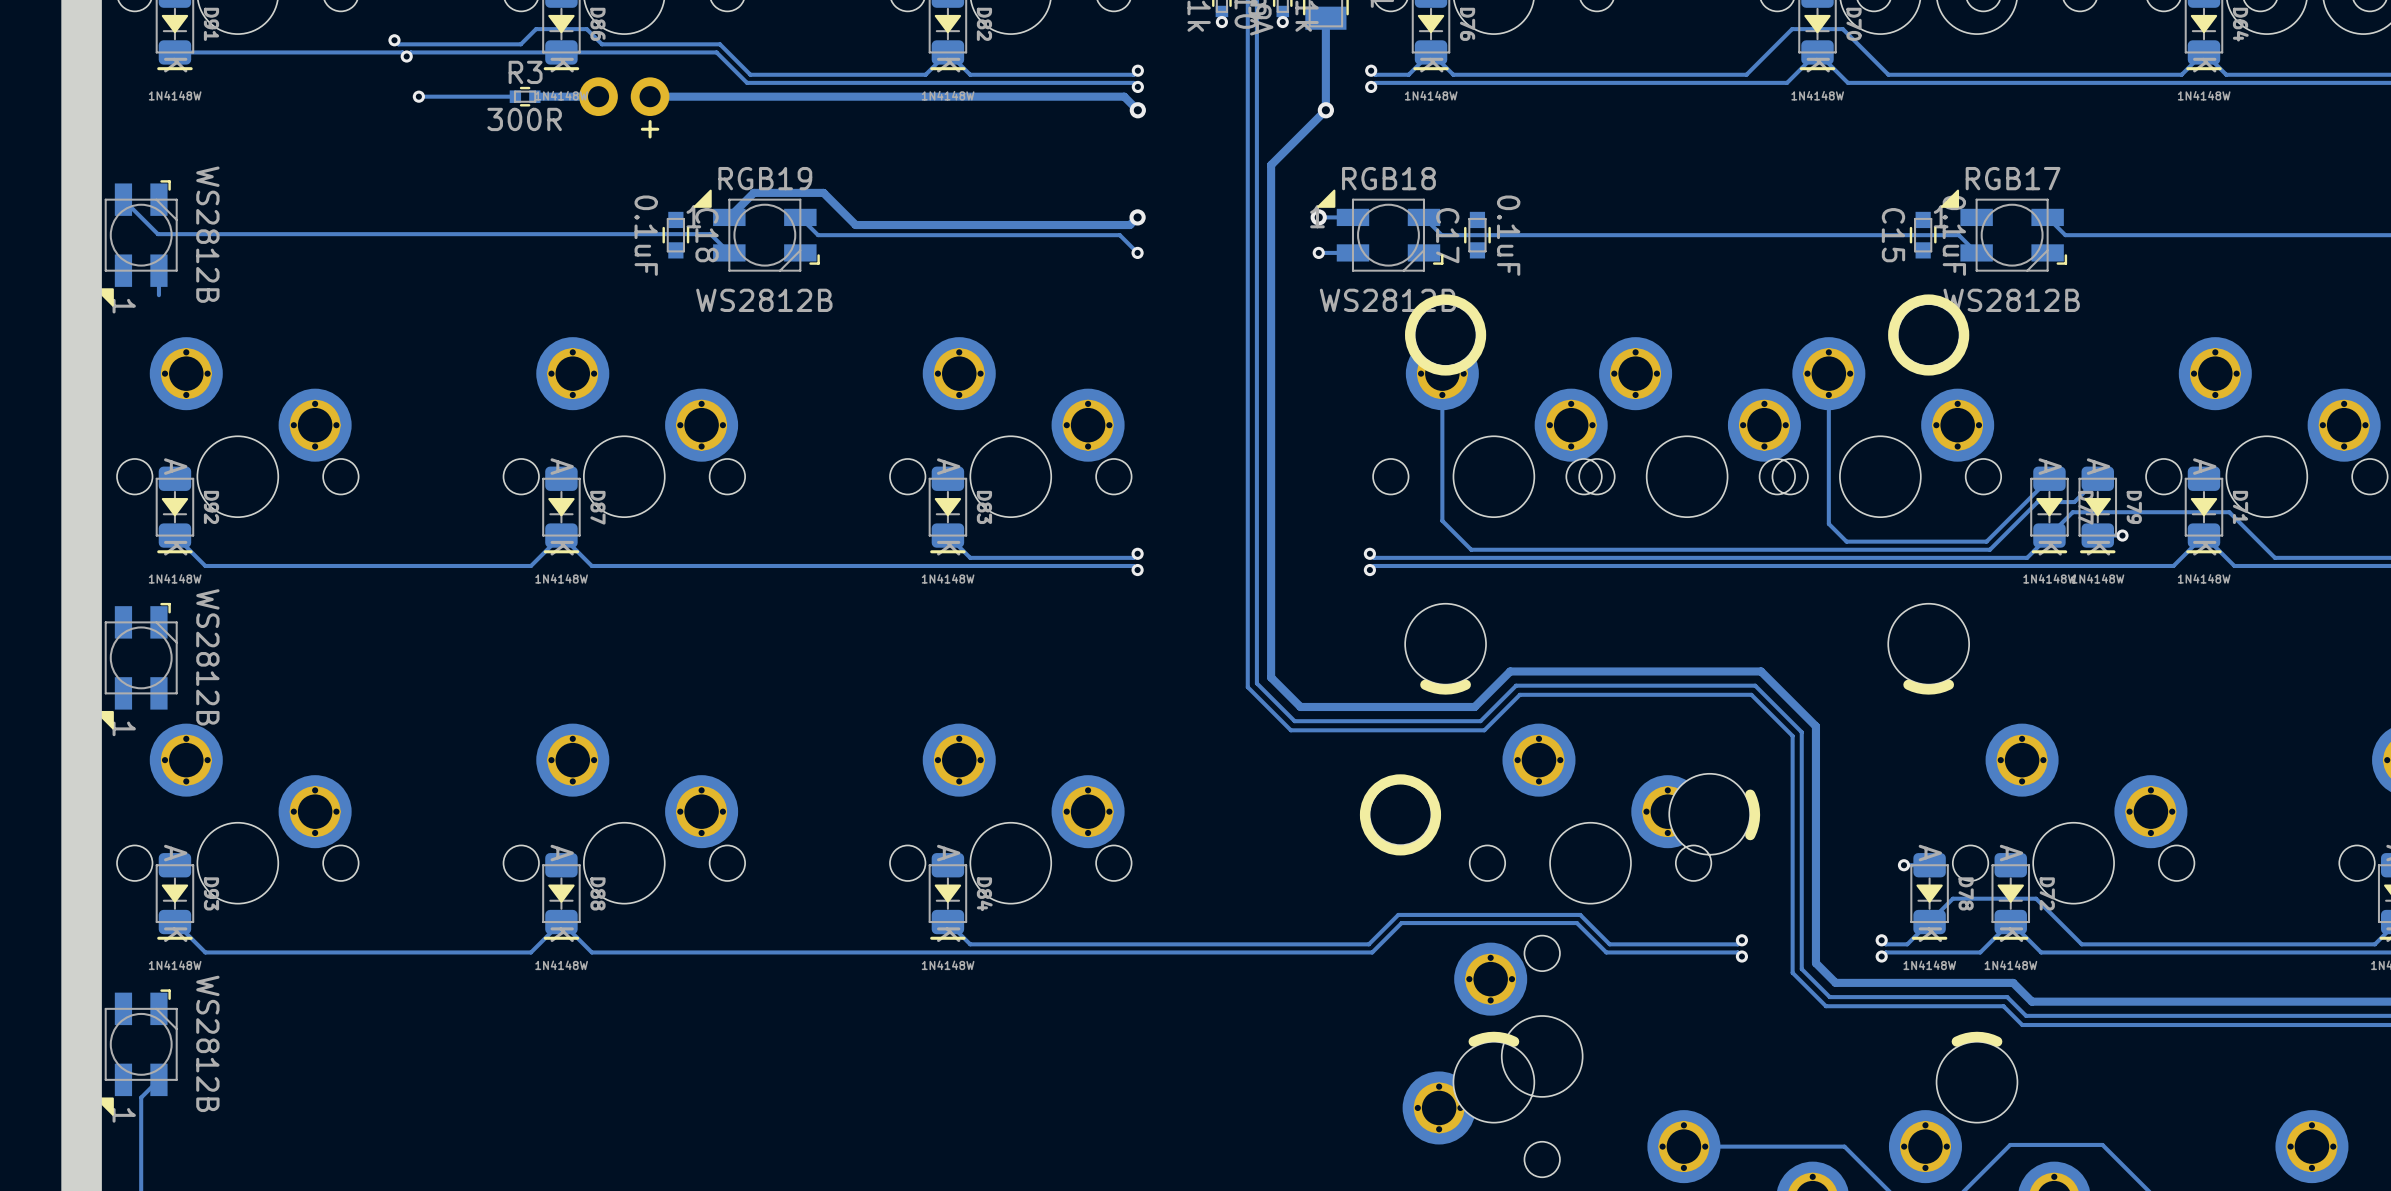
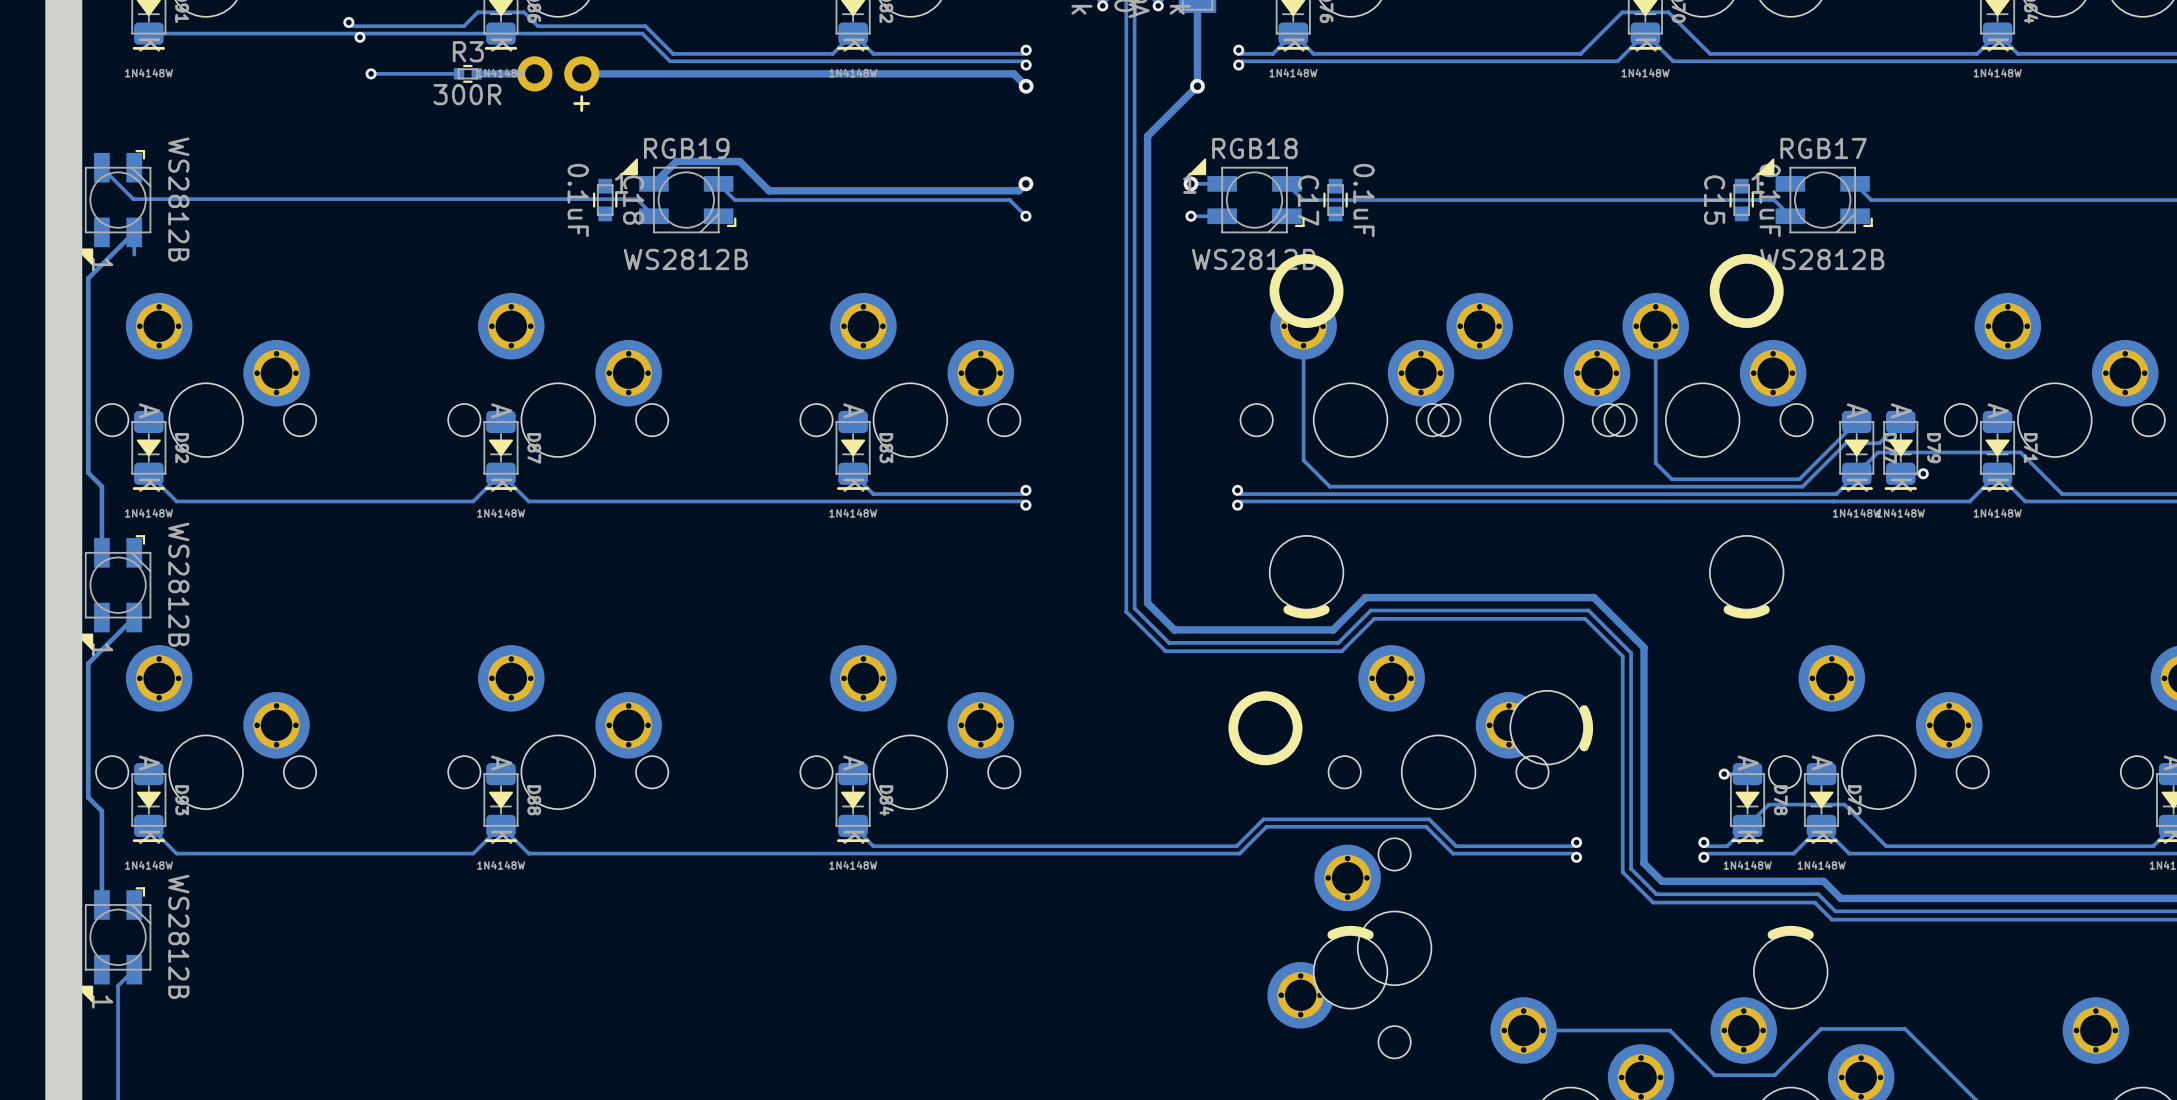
track: none -> (134, 232) (88, 278) (88, 472) (101, 486) (101, 552)
track: none -> (134, 617) (88, 663) (88, 797) (101, 811) (101, 904)

